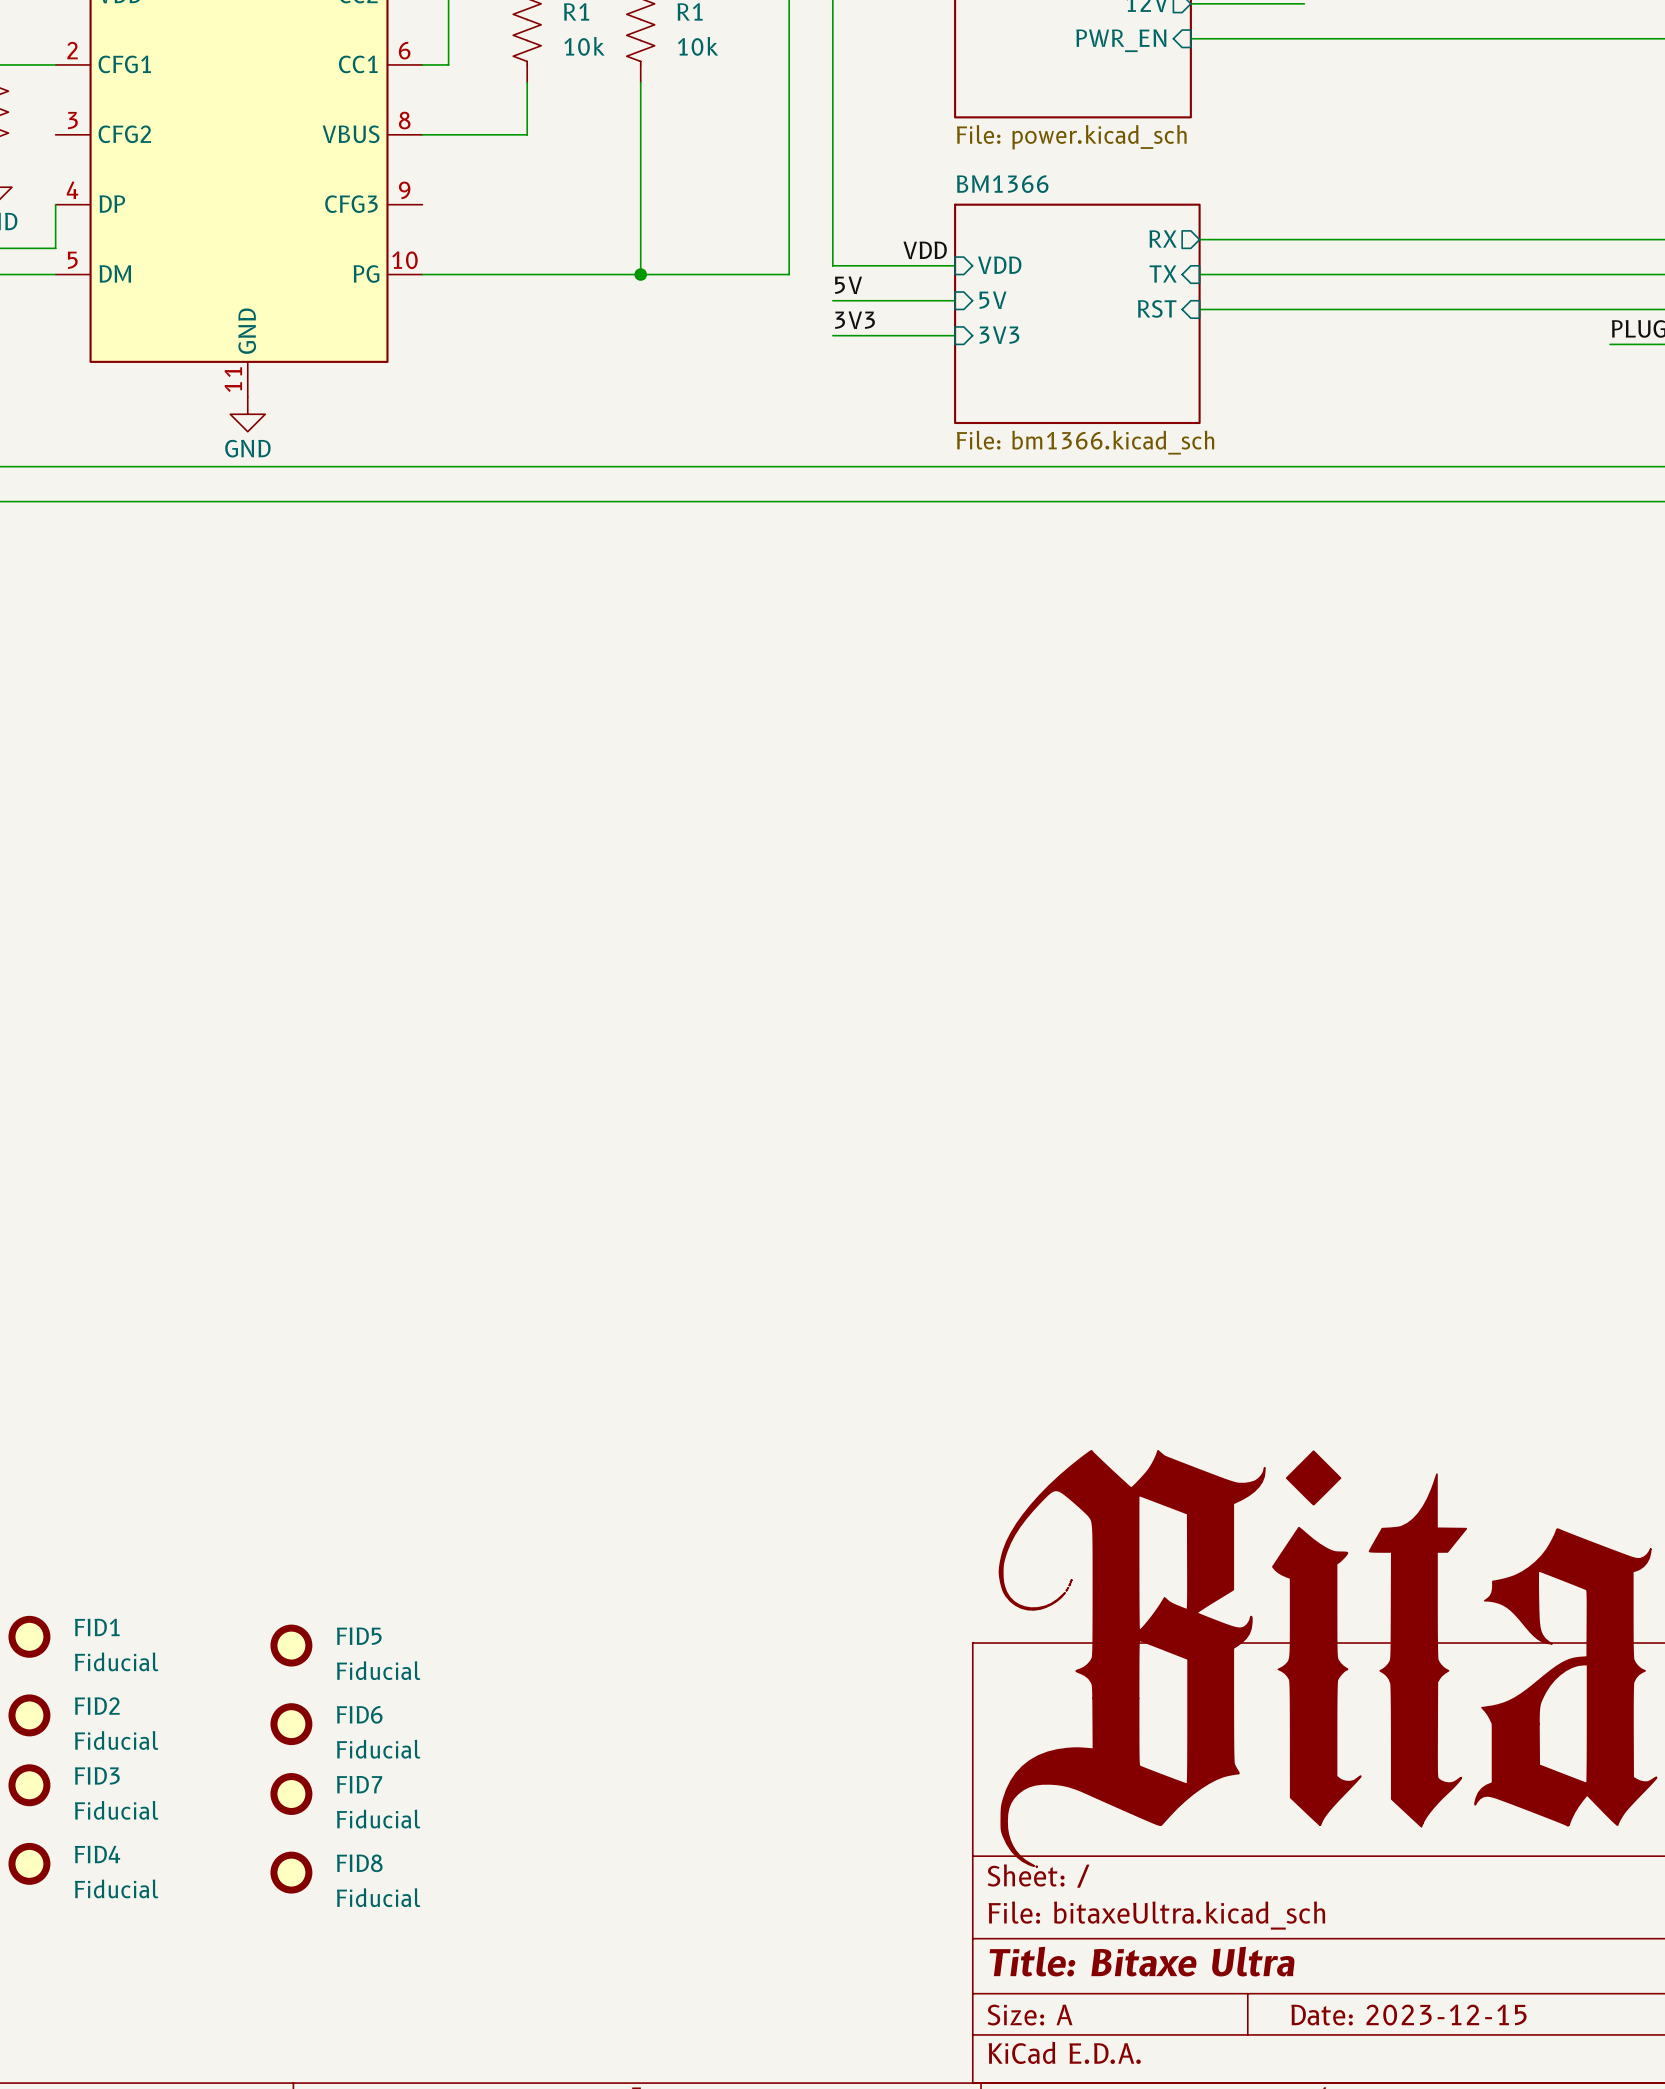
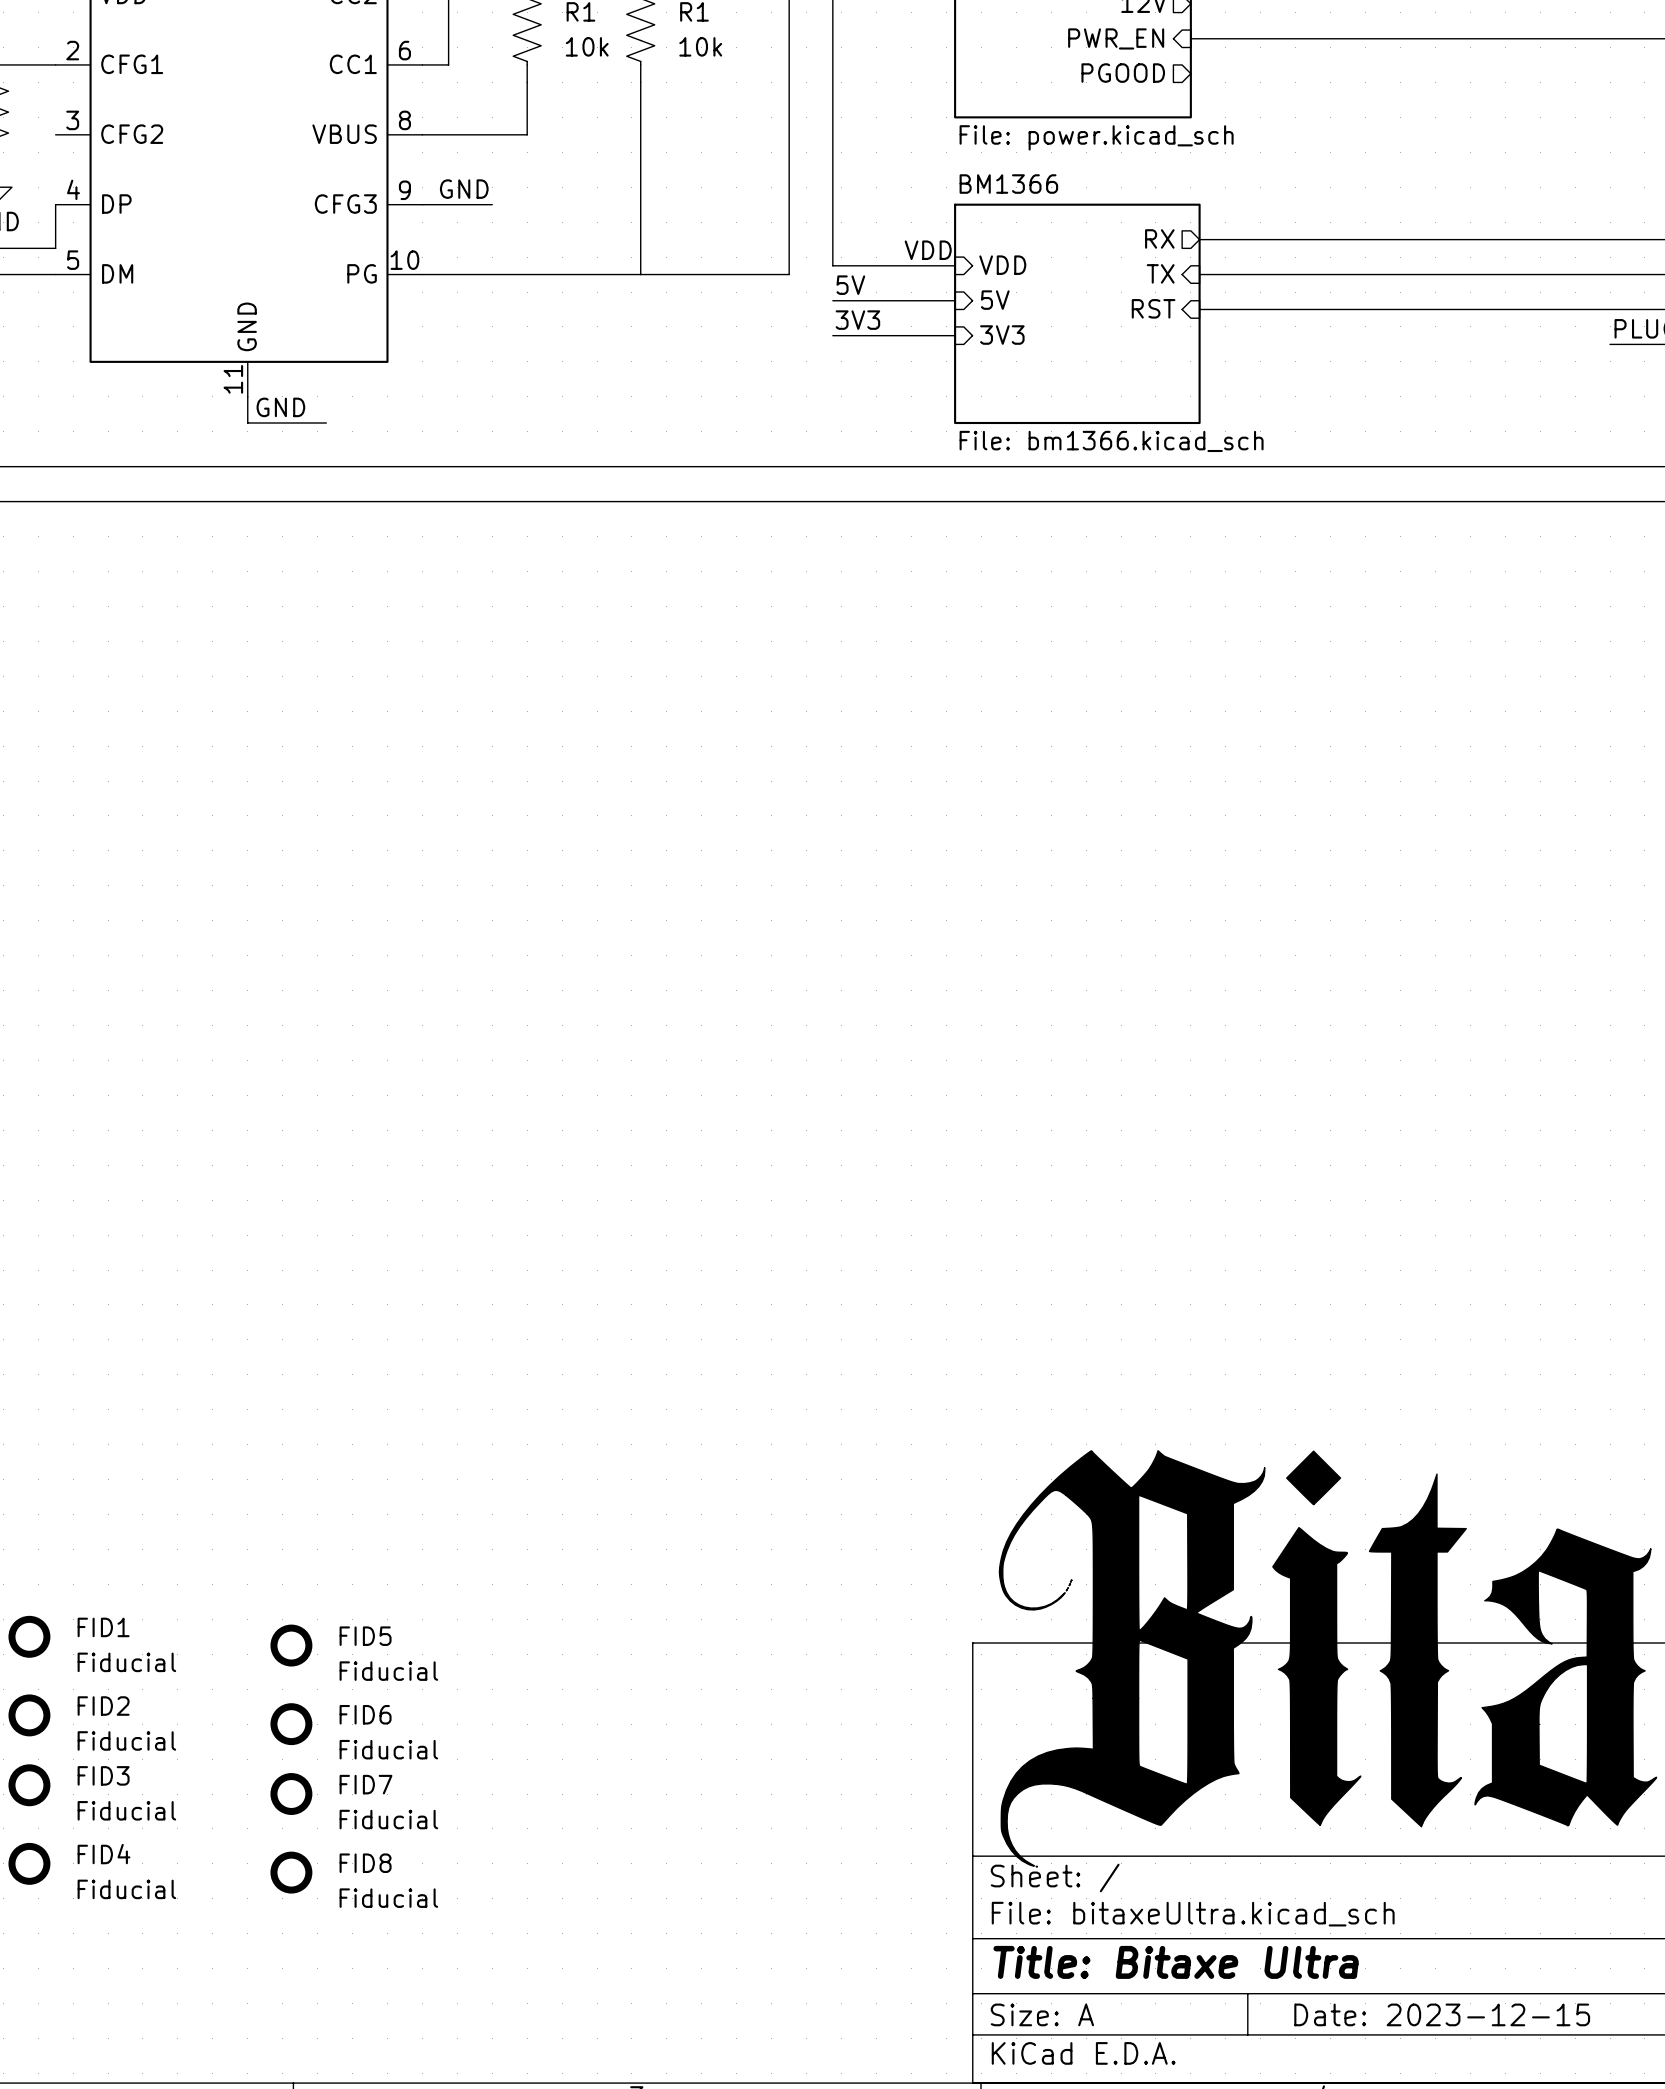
wire: (1190, 3) (1304, 3) -> none
sheet pin: none -> PGOOD (1123, 73)
label: none -> GND (464, 189)
wire: none -> (422, 204) (492, 204)
junction: (640, 274) -> none
wire: none -> (247, 396) (247, 423) (326, 423)
label: none -> GND (280, 407)
power symbol: GND (247, 414) -> none

